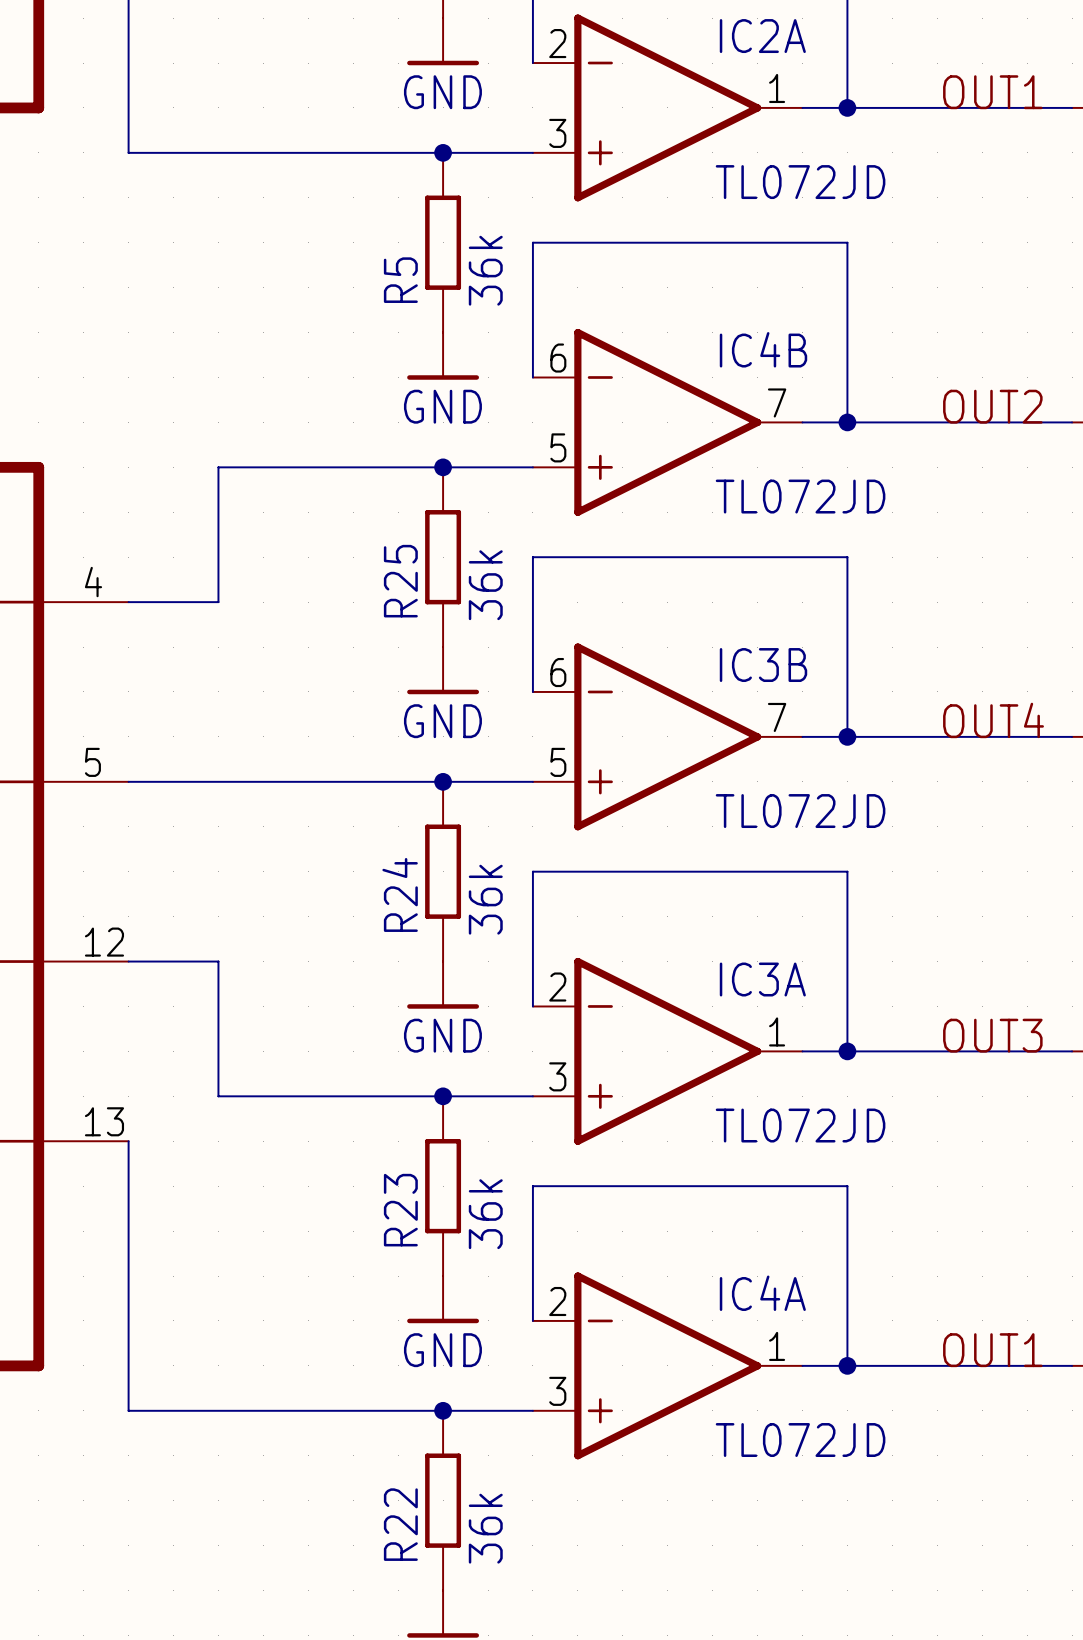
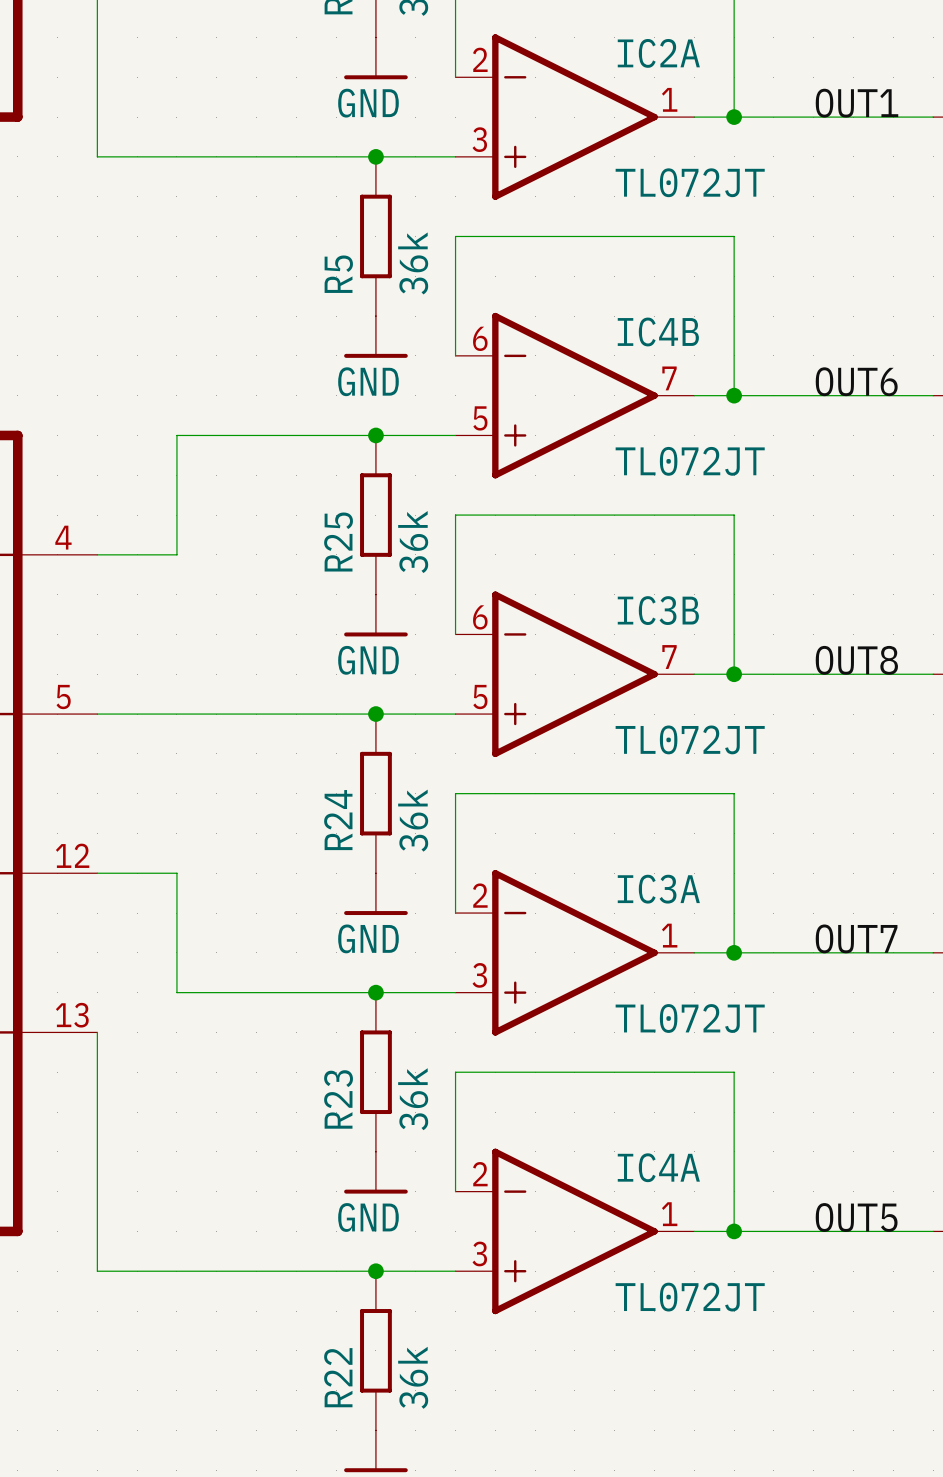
IC2A value: TL072JD (800, 182) -> TL072JT (690, 182)
label: OUT2 (992, 406) -> OUT6 (856, 381)
IC4B value: TL072JD (800, 496) -> TL072JT (690, 461)
label: OUT4 (993, 720) -> OUT8 (856, 660)
IC3B value: TL072JD (800, 811) -> TL072JT (690, 739)
label: OUT3 (992, 1035) -> OUT7 (856, 938)
IC3A value: TL072JD (800, 1125) -> TL072JT (690, 1018)
label: OUT1 (992, 1350) -> OUT5 (856, 1217)
IC4A value: TL072JD (800, 1440) -> TL072JT (690, 1297)

